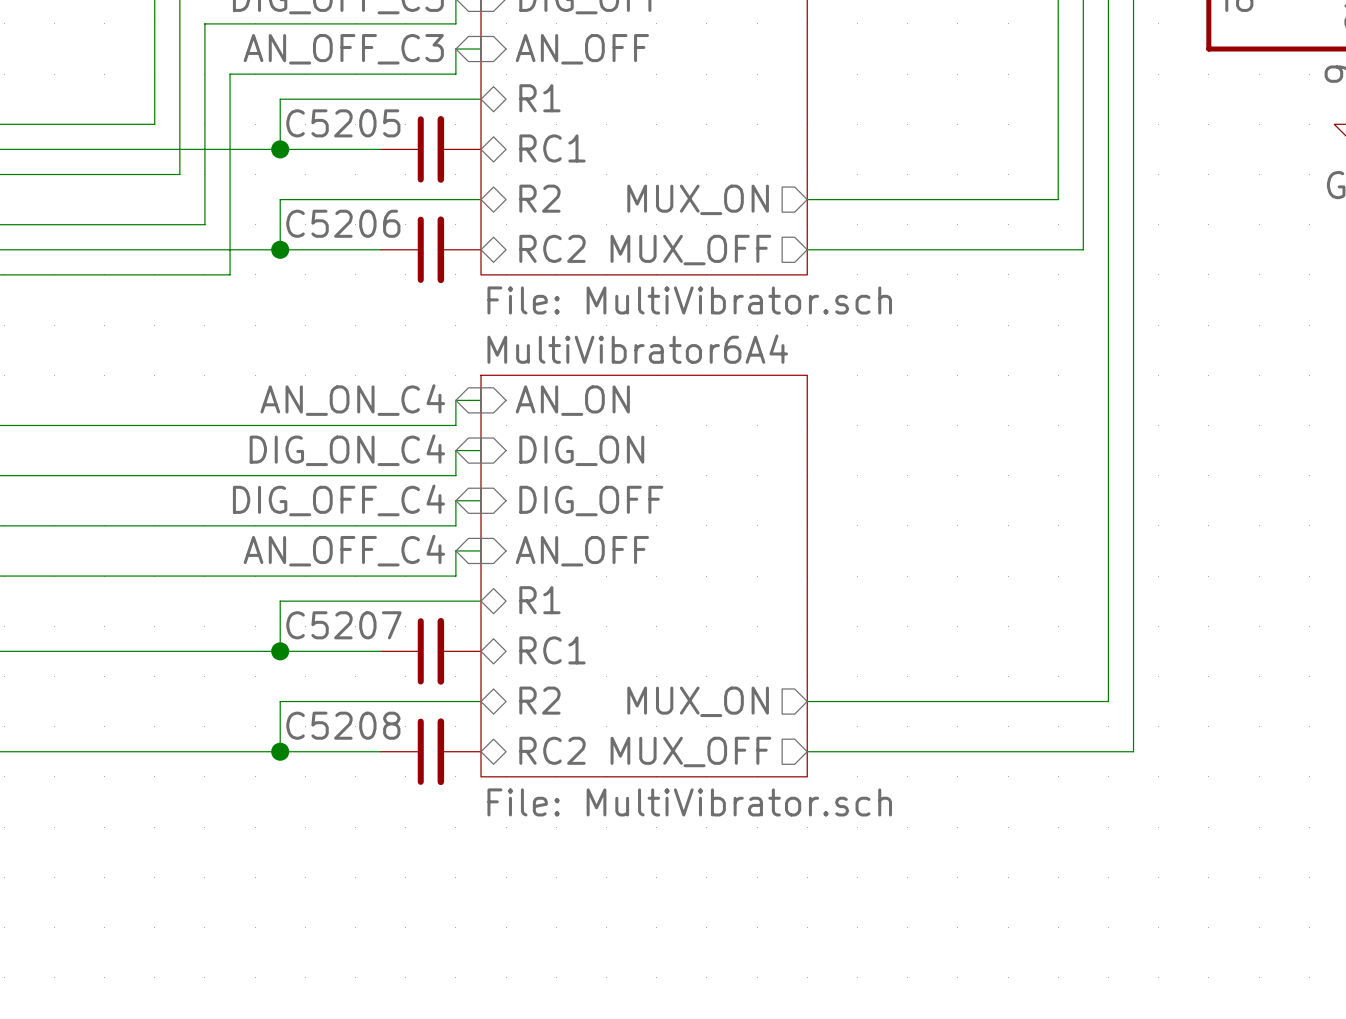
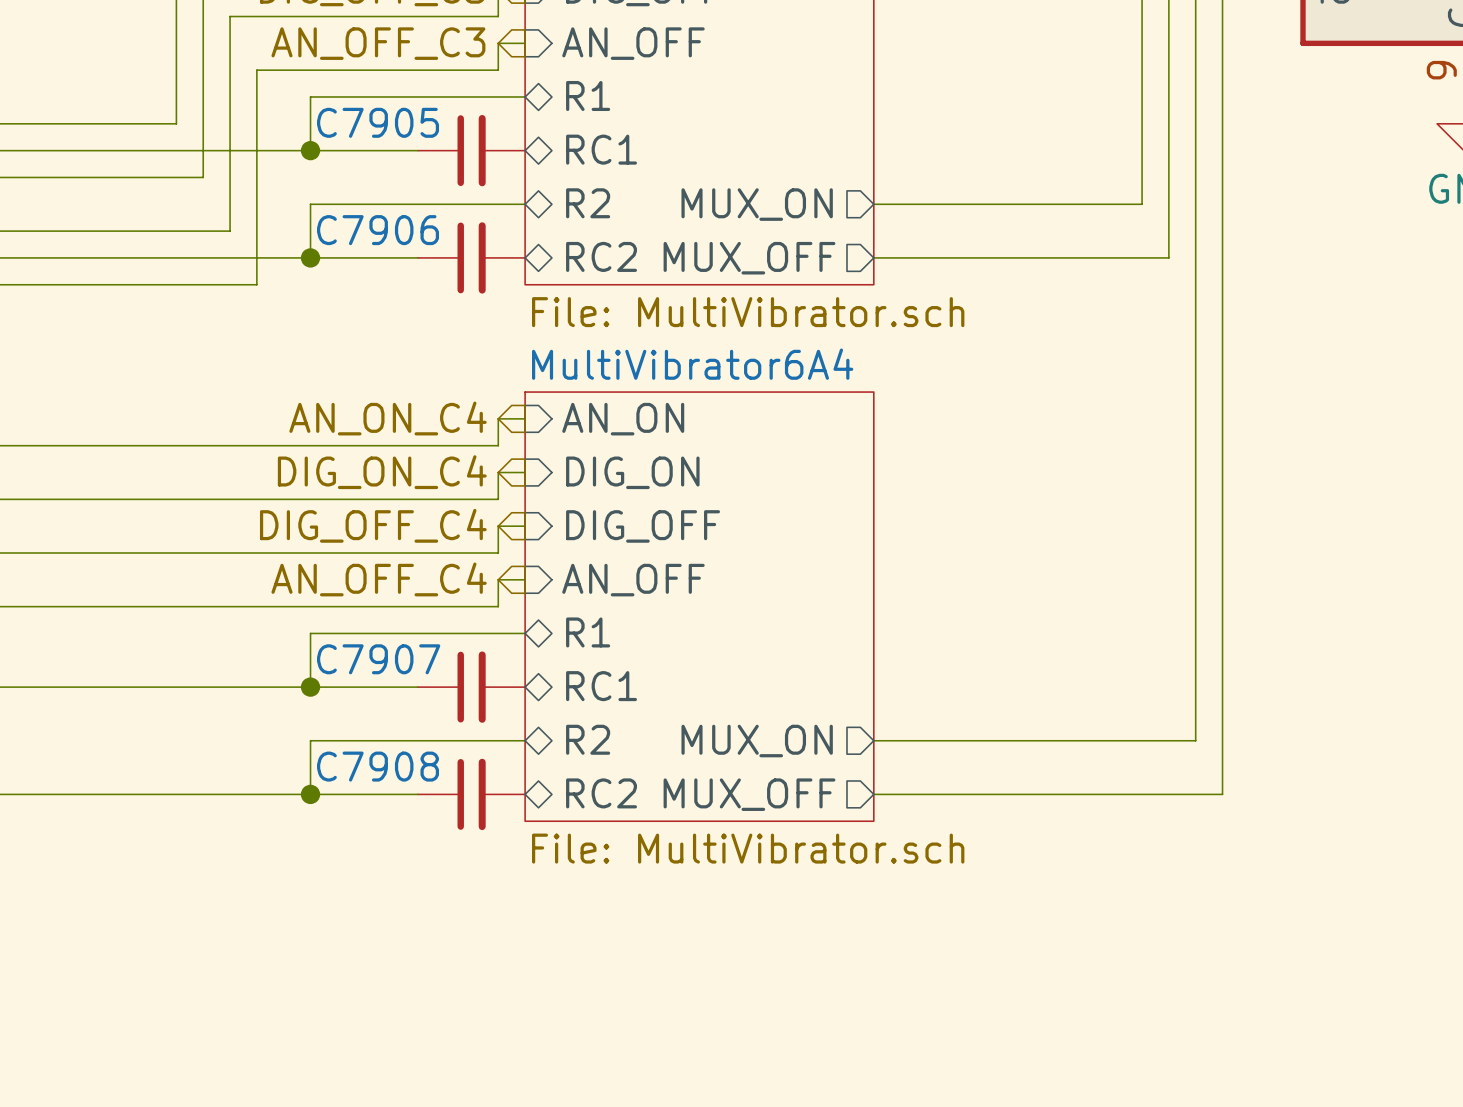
C5205 name: C5205 (343, 123) -> C7905 (378, 122)
C5206 name: C5206 (343, 223) -> C7906 (378, 230)
C5207 name: C5207 (343, 625) -> C7907 (378, 659)
C5208 name: C5208 (343, 725) -> C7908 (378, 766)

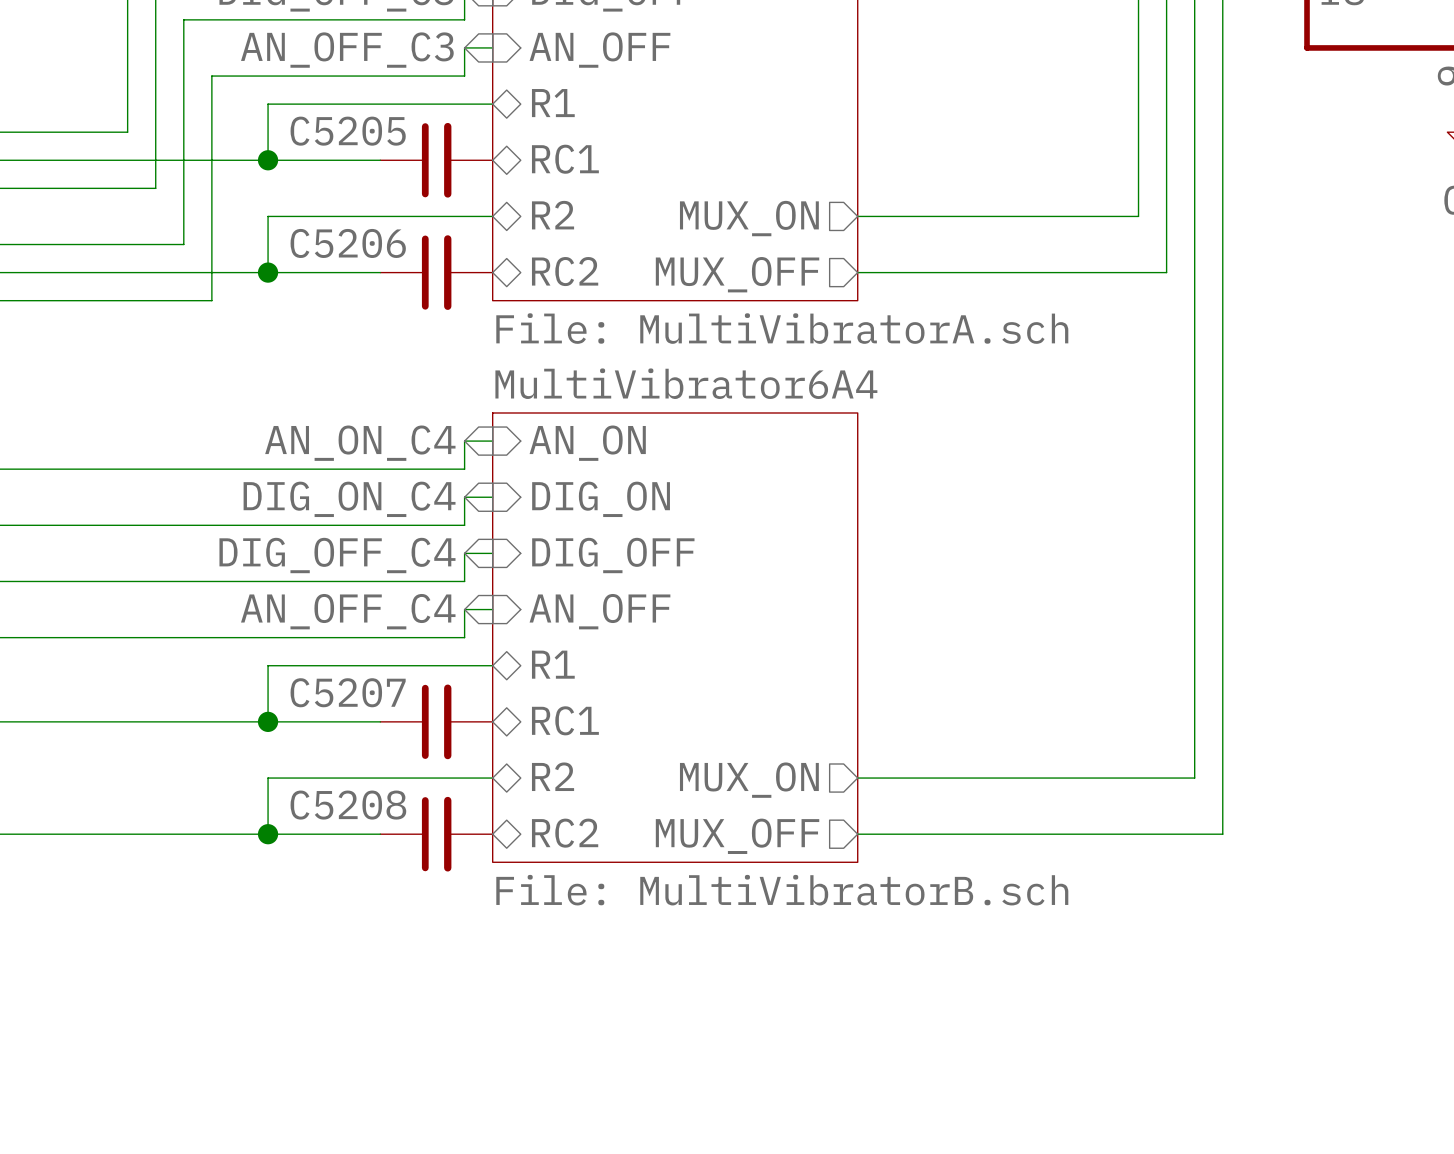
C7905 name: C7905 (378, 122) -> C5205 (348, 131)
C7906 name: C7906 (378, 230) -> C5206 (348, 243)
sheet value: File: MultiVibrator.sch (748, 312) -> File: MultiVibratorA.sch (782, 328)
C7907 name: C7907 (378, 659) -> C5207 (348, 692)
C7908 name: C7908 (378, 766) -> C5208 (348, 805)
sheet MultiVibrator6A4 value: File: MultiVibrator.sch (748, 848) -> File: MultiVibratorB.sch (782, 890)

